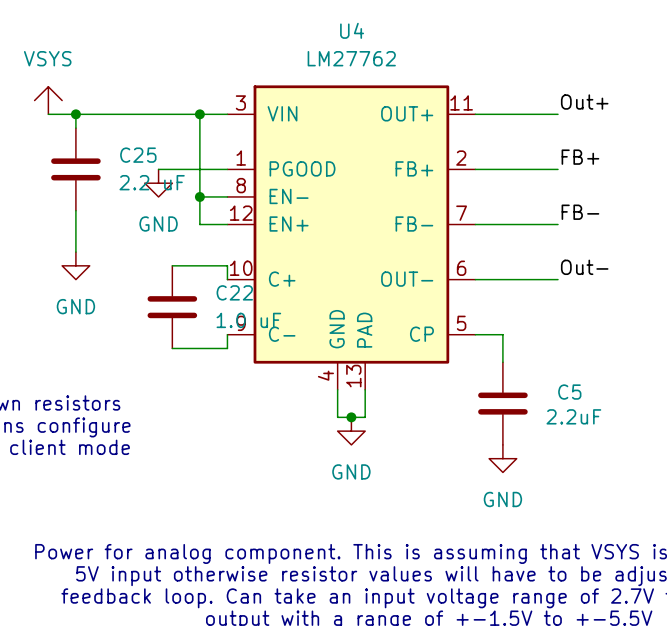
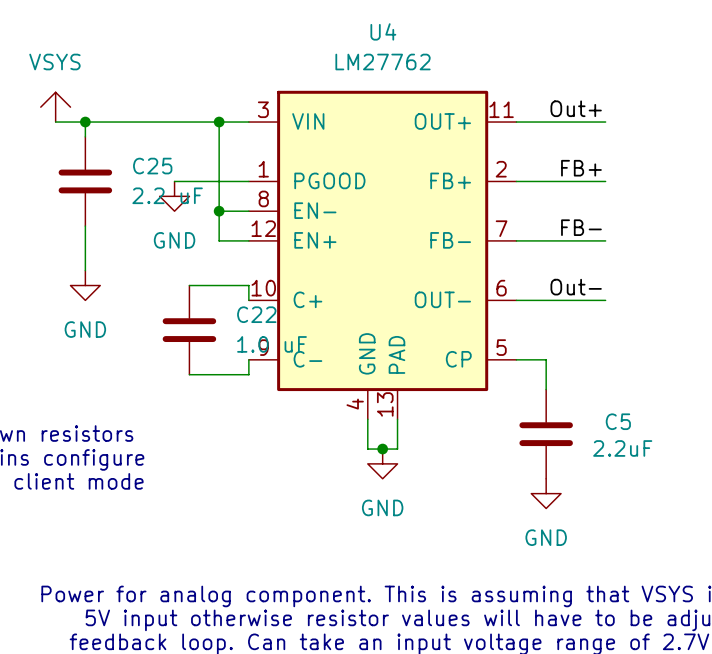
label position: Out+ (584, 102) -> Out+ (576, 108)
label position: FB+ (580, 157) -> FB+ (581, 168)
label position: FB- (580, 212) -> FB- (581, 227)
label position: Out- (584, 267) -> Out- (576, 287)

